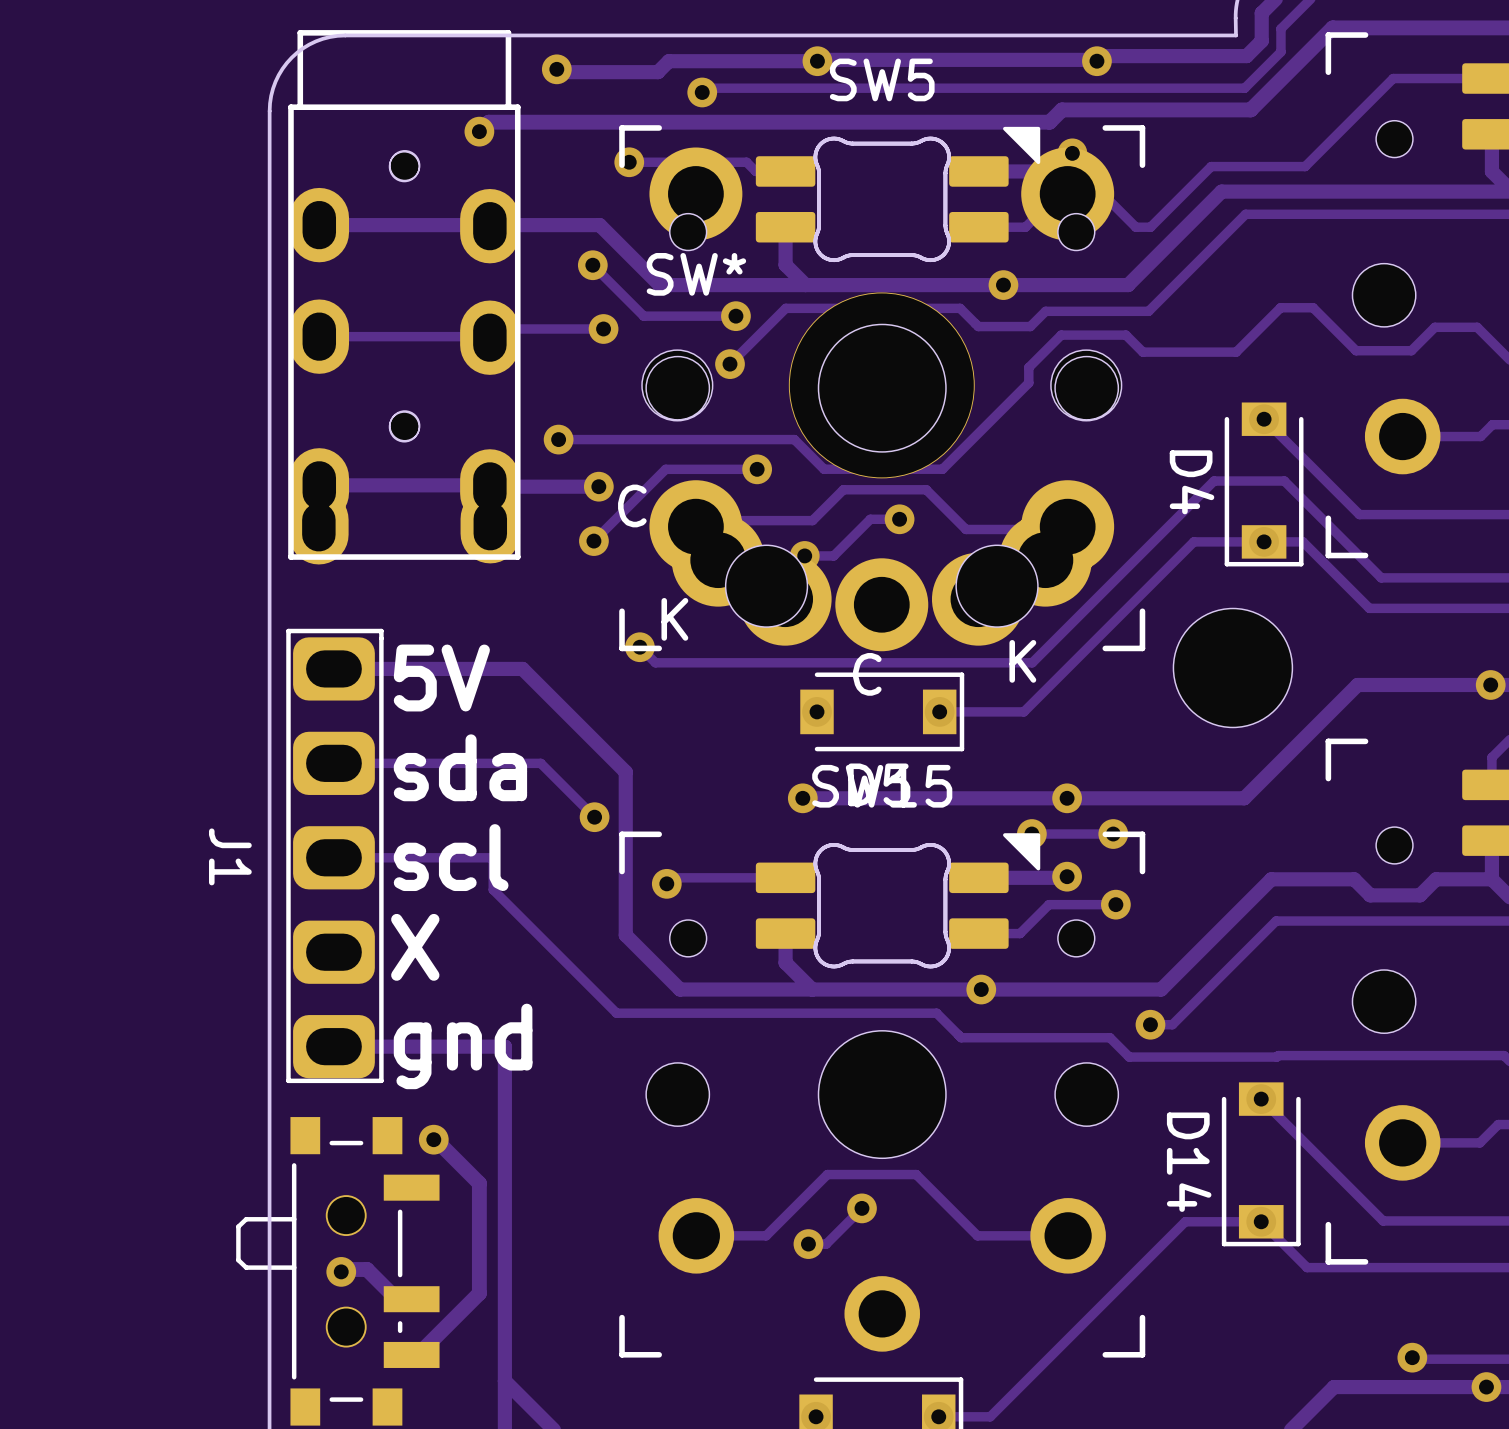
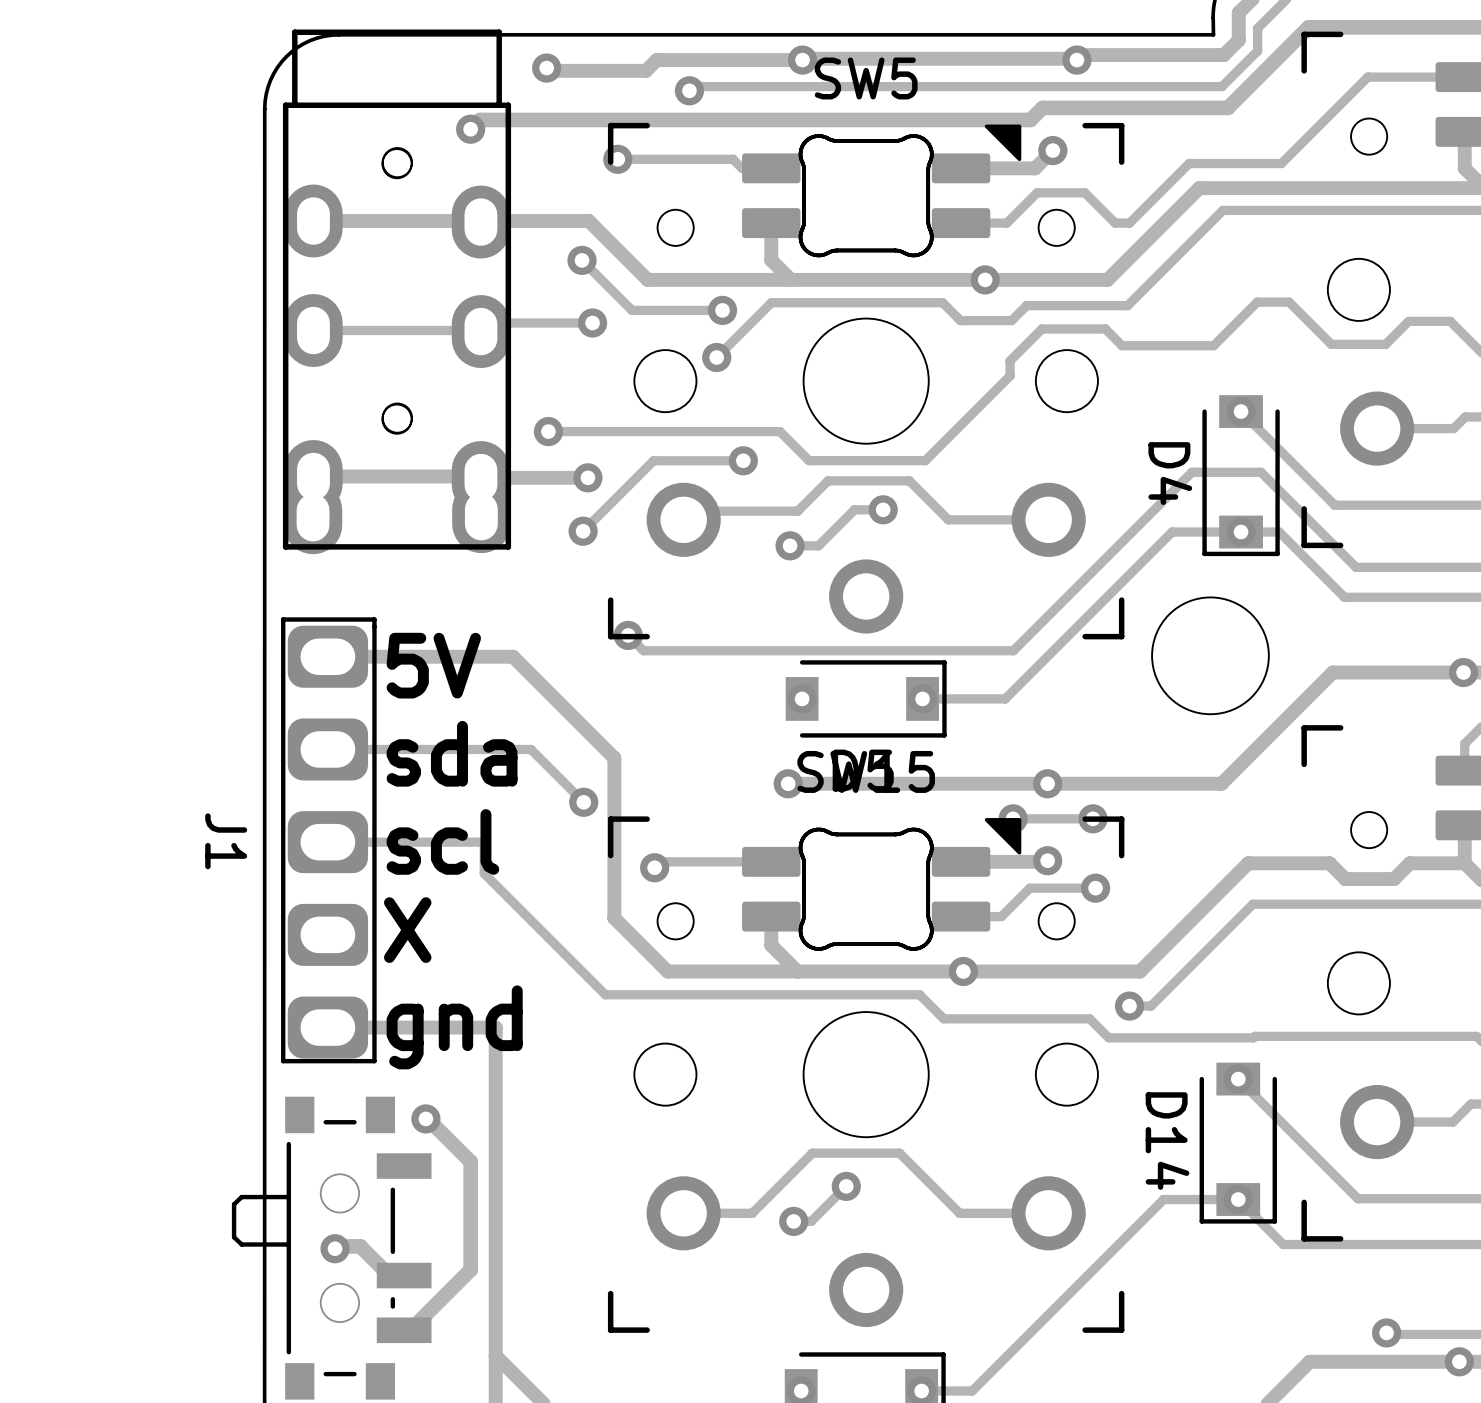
SW*: (881, 399) -> none

